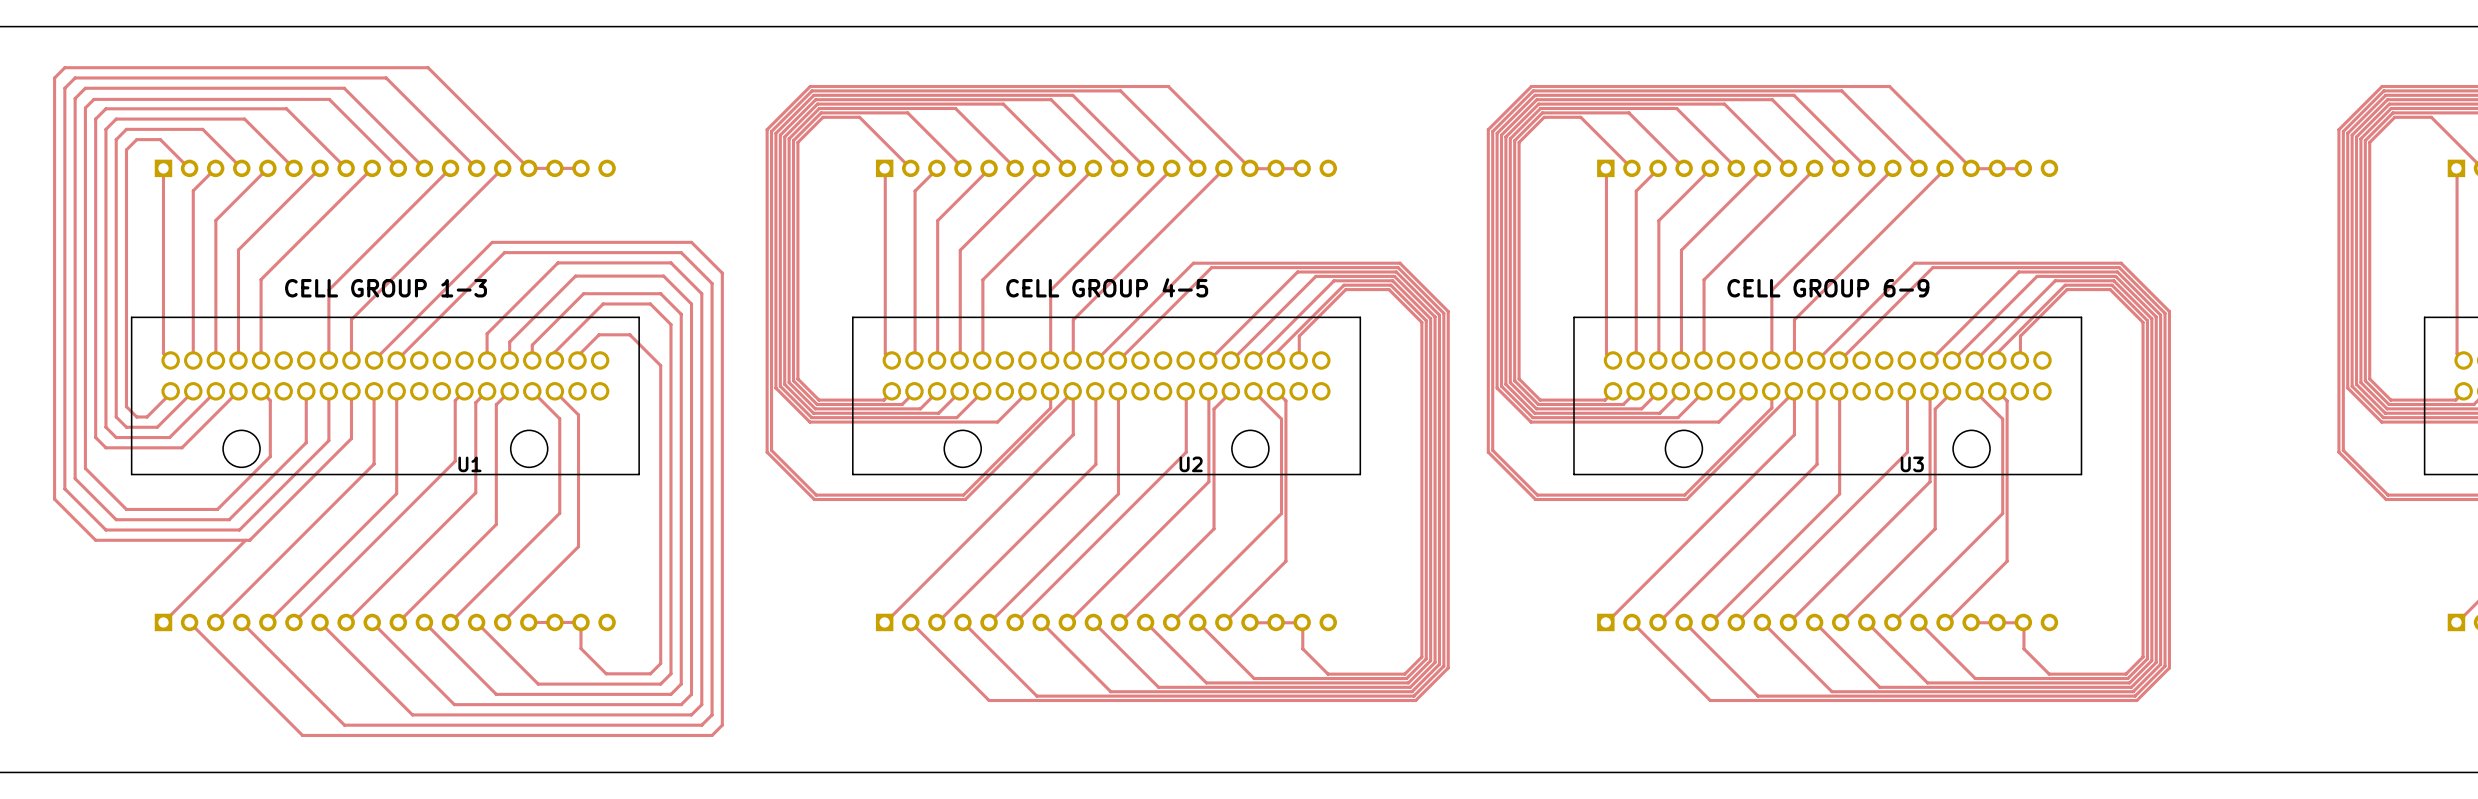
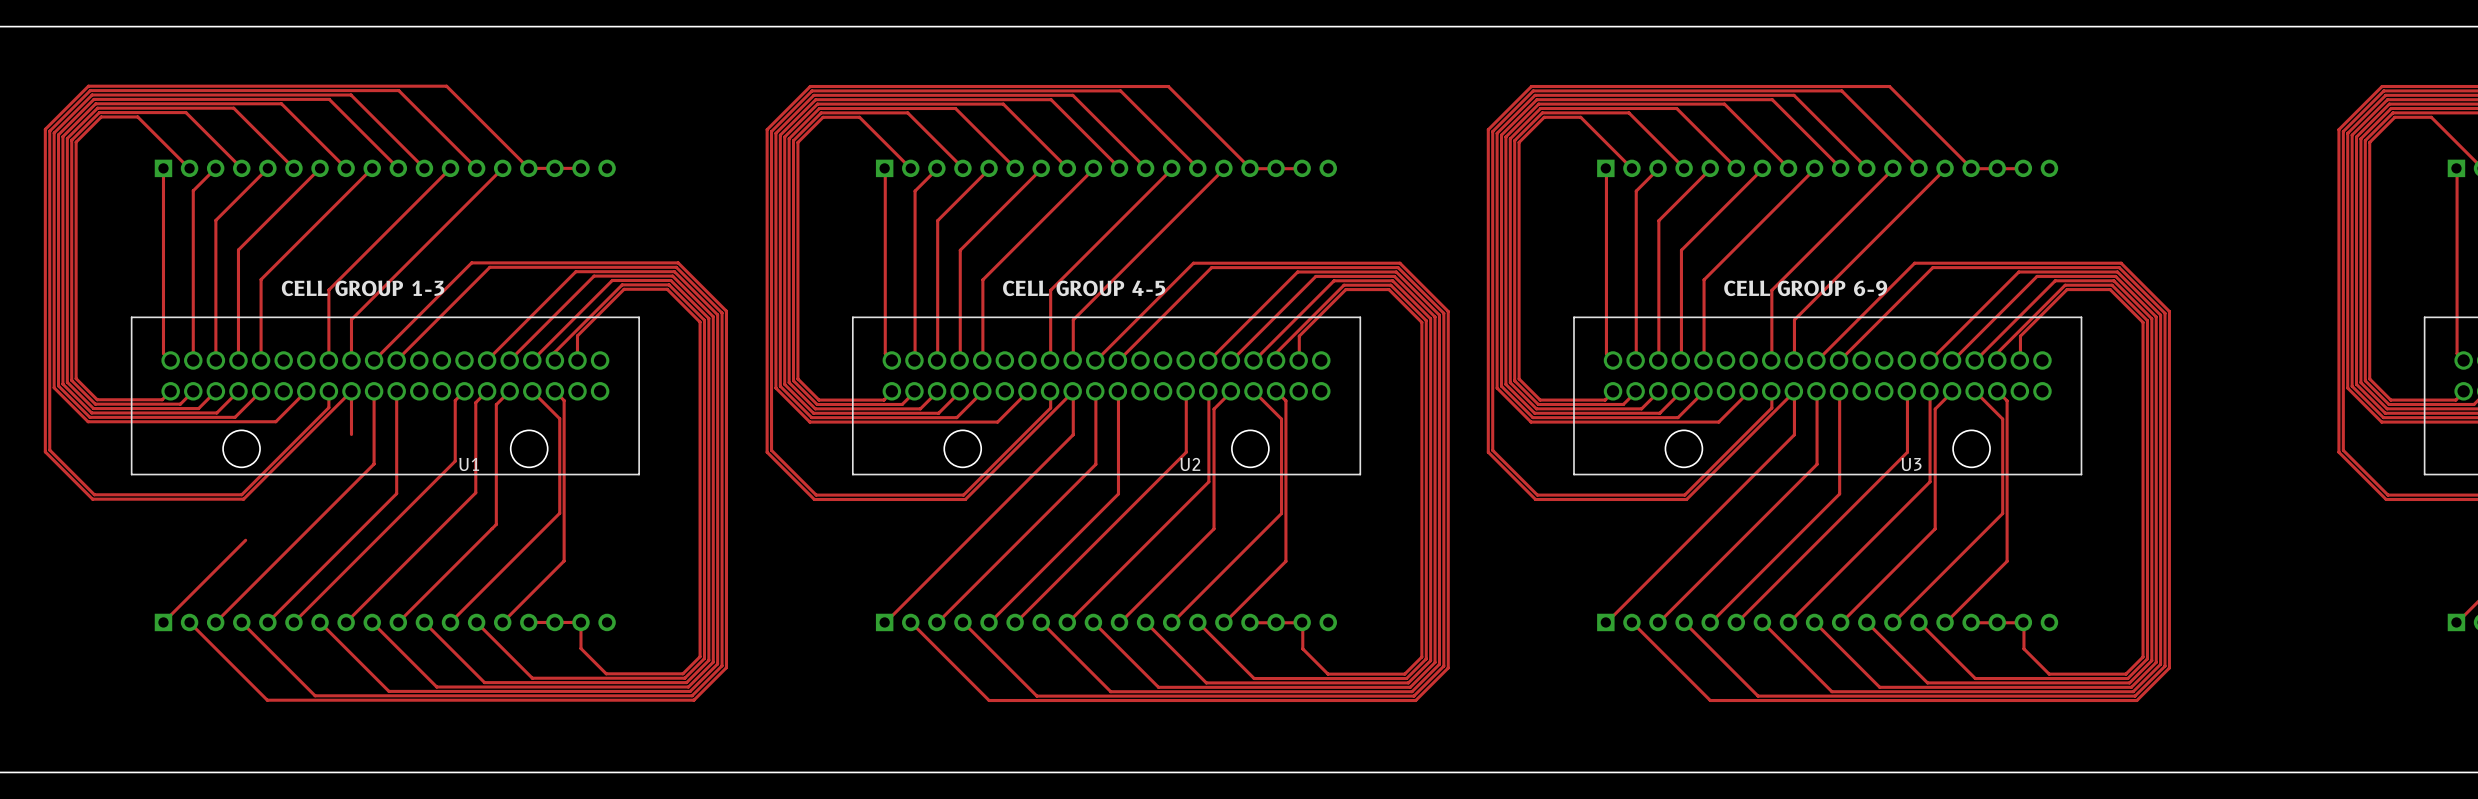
top track: (446, 86) (428, 67) (64, 67) (54, 77) (54, 499) (95, 540) (249, 540) (351, 438) (351, 434) -> (446, 86) (88, 86) (45, 129) (45, 451) (92, 499) (243, 499) (351, 391)
top track: (398, 90) (386, 77) (75, 77) (64, 88) (64, 488) (105, 530) (239, 530) (328, 440) (328, 407) -> (398, 90) (90, 90) (49, 131) (49, 450) (94, 494) (241, 494) (328, 407)
top track: (351, 94) (344, 88) (85, 88) (75, 98) (75, 478) (116, 519) (229, 519) (306, 442) (306, 391) -> (351, 94) (92, 94) (54, 132) (54, 387) (88, 421) (275, 421) (306, 391)
top track: (85, 107) (85, 468) (126, 509) (217, 509) (270, 456) (270, 400) (261, 391) -> (85, 107) (58, 134) (58, 385) (89, 417) (235, 417) (261, 391)
top track: (286, 108) (105, 108) (95, 119) (95, 437) (105, 447) (181, 447) (216, 412) -> (286, 108) (281, 103) (95, 103) (62, 136) (62, 384) (91, 412) (216, 412)
top track: (244, 119) (116, 119) (105, 129) (105, 427) (116, 437) (169, 437) (198, 408) -> (244, 119) (233, 108) (97, 108) (67, 138) (67, 382) (93, 408) (198, 408)
top track: (202, 129) (126, 129) (116, 139) (116, 416) (126, 427) (157, 427) (180, 404) -> (202, 129) (185, 112) (99, 112) (71, 140) (71, 380) (95, 404) (180, 404)
top track: (160, 139) (136, 139) (126, 149) (126, 406) (136, 416) (147, 416) (170, 391) -> (160, 139) (137, 116) (101, 116) (76, 142) (76, 378) (97, 399) (162, 399) (170, 391)
top track: (471, 262) (492, 242) (691, 242) (722, 273) (722, 725) (712, 735) (302, 735) (267, 700) -> none
top track: (557, 262) (487, 333) (487, 360) -> (557, 262) (471, 262)
top track: (670, 262) (701, 293) (701, 704) (691, 714) (412, 714) (389, 691) -> (670, 262) (678, 262) (726, 311) (726, 667) (693, 700) (267, 700)
top track: (489, 267) (504, 252) (681, 252) (712, 283) (712, 714) (701, 725) (344, 725) (315, 695) -> (489, 267) (676, 267) (722, 313) (722, 665) (692, 695) (315, 695)
top track: (594, 276) (575, 276) (509, 342) (509, 360) -> (594, 276) (509, 360)
top track: (663, 276) (691, 303) (691, 694) (681, 704) (454, 704) (436, 687) -> (663, 276) (672, 276) (713, 316) (713, 662) (688, 687) (436, 687)
top track: (603, 303) (650, 303) (670, 324) (670, 673) (660, 684) (538, 684) (532, 678) -> (603, 303) (622, 284) (669, 284) (704, 320) (704, 658) (684, 678) (532, 678)
top track: (577, 356) (599, 334) (629, 334) (660, 365) (660, 663) (650, 673) -> (577, 356) (577, 335) (624, 289) (667, 289) (700, 322) (700, 656) (682, 673) (650, 673)
top track: none -> (487, 360) (575, 271) (674, 271) (717, 314) (717, 664) (690, 691) (389, 691)
top track: (532, 360) (532, 345) (583, 293) (660, 293) (681, 314) (681, 684) (670, 694) (496, 694) (484, 682) -> (532, 360) (612, 280) (670, 280) (708, 318) (708, 660) (686, 682) (484, 682)
top track: (564, 400) (578, 414) (578, 546) (564, 561) -> (564, 400) (564, 561)

